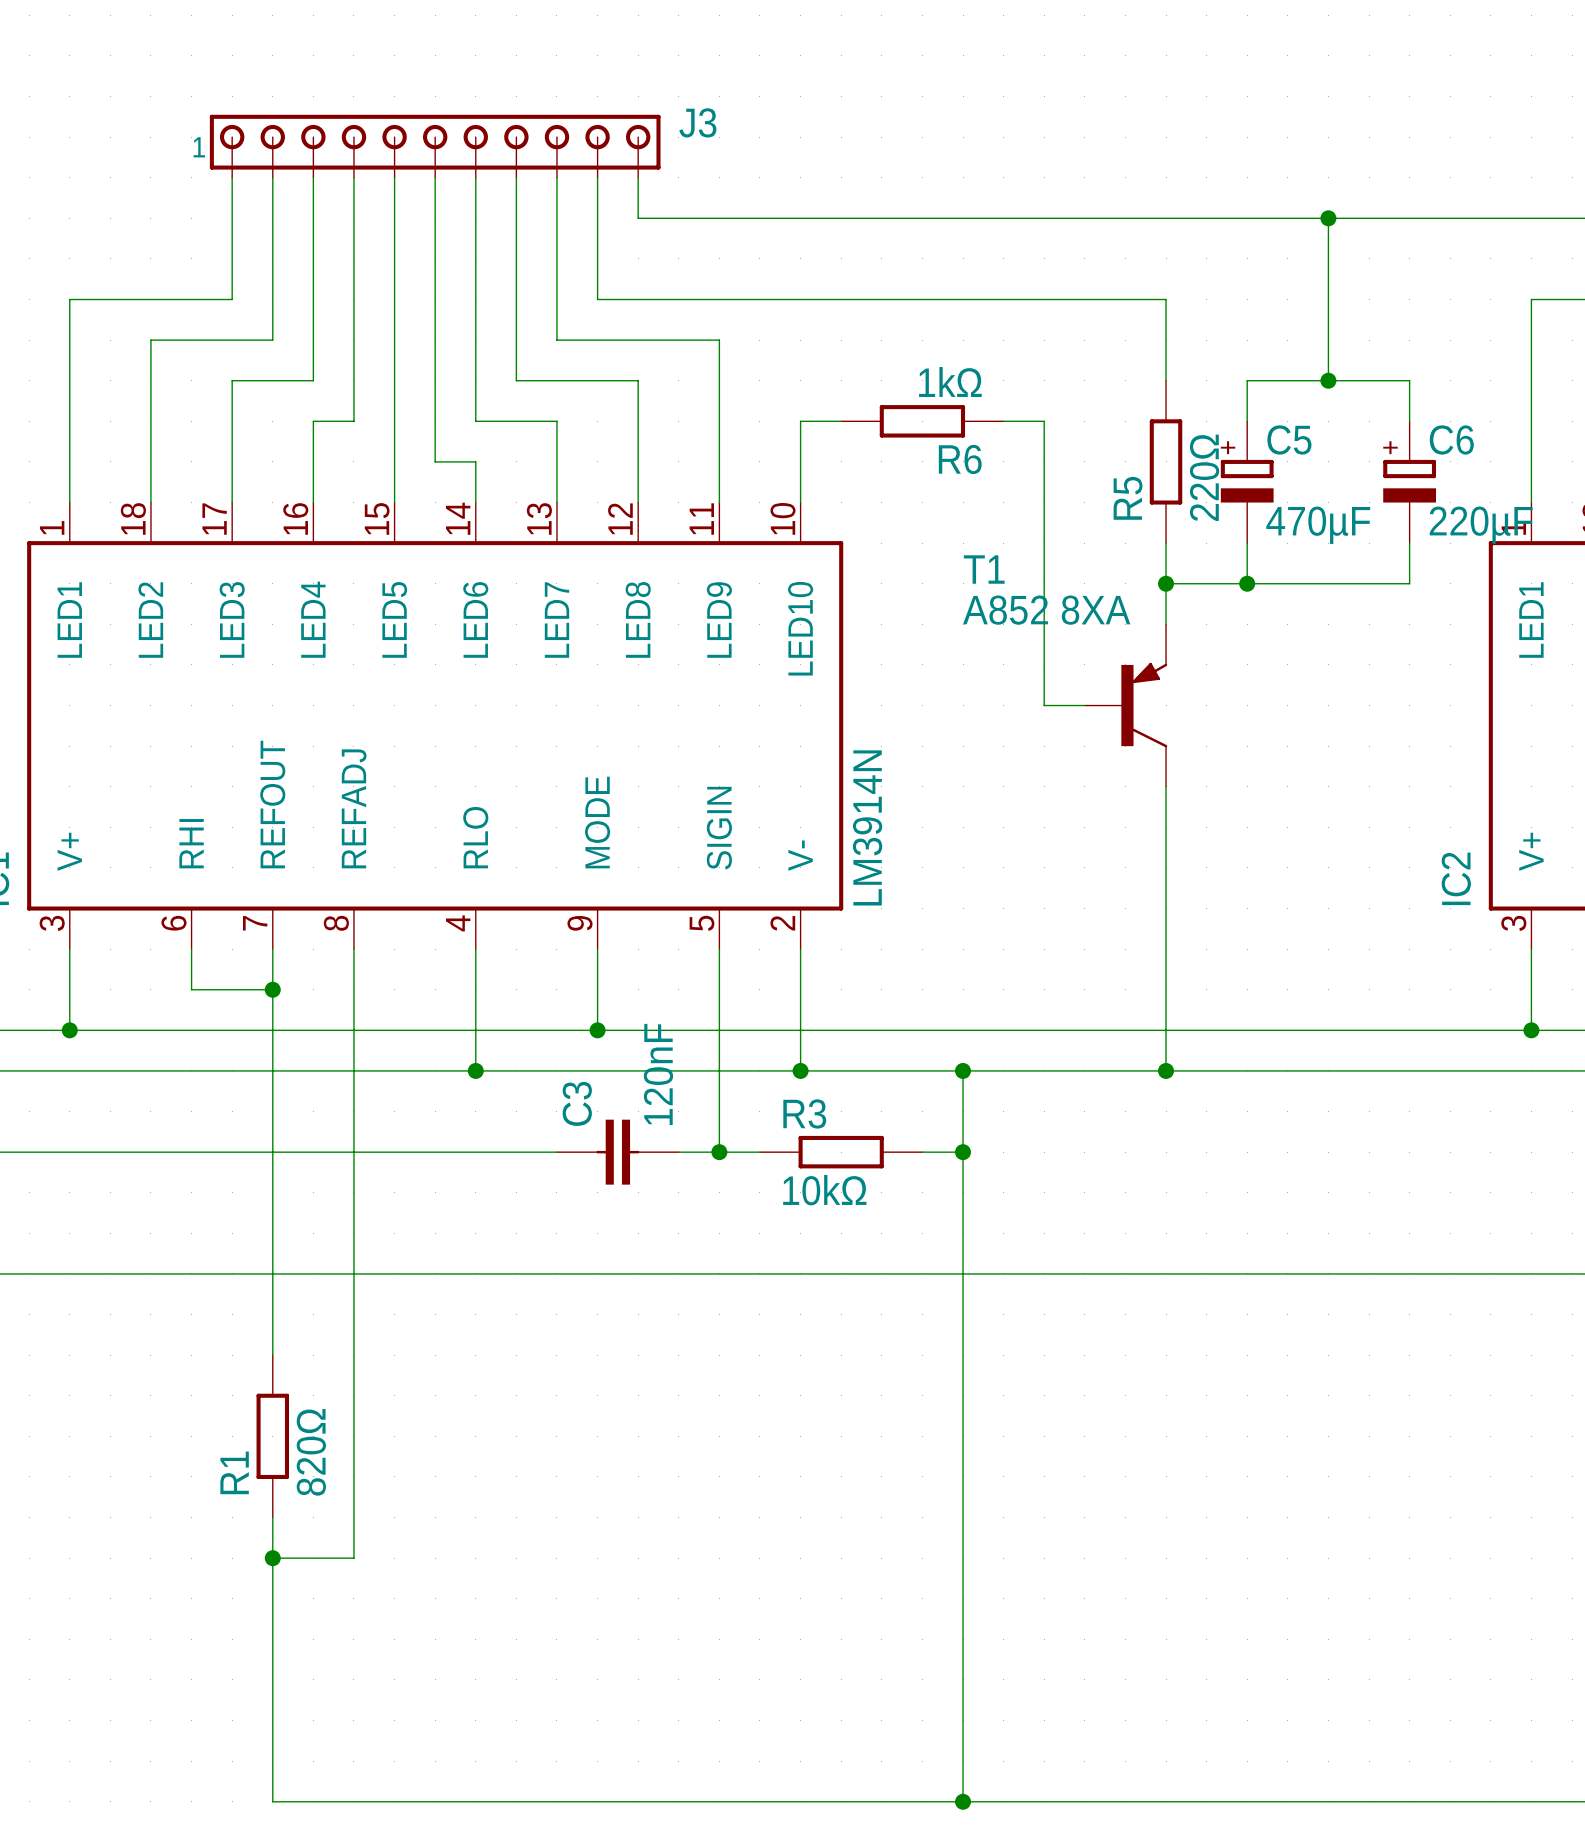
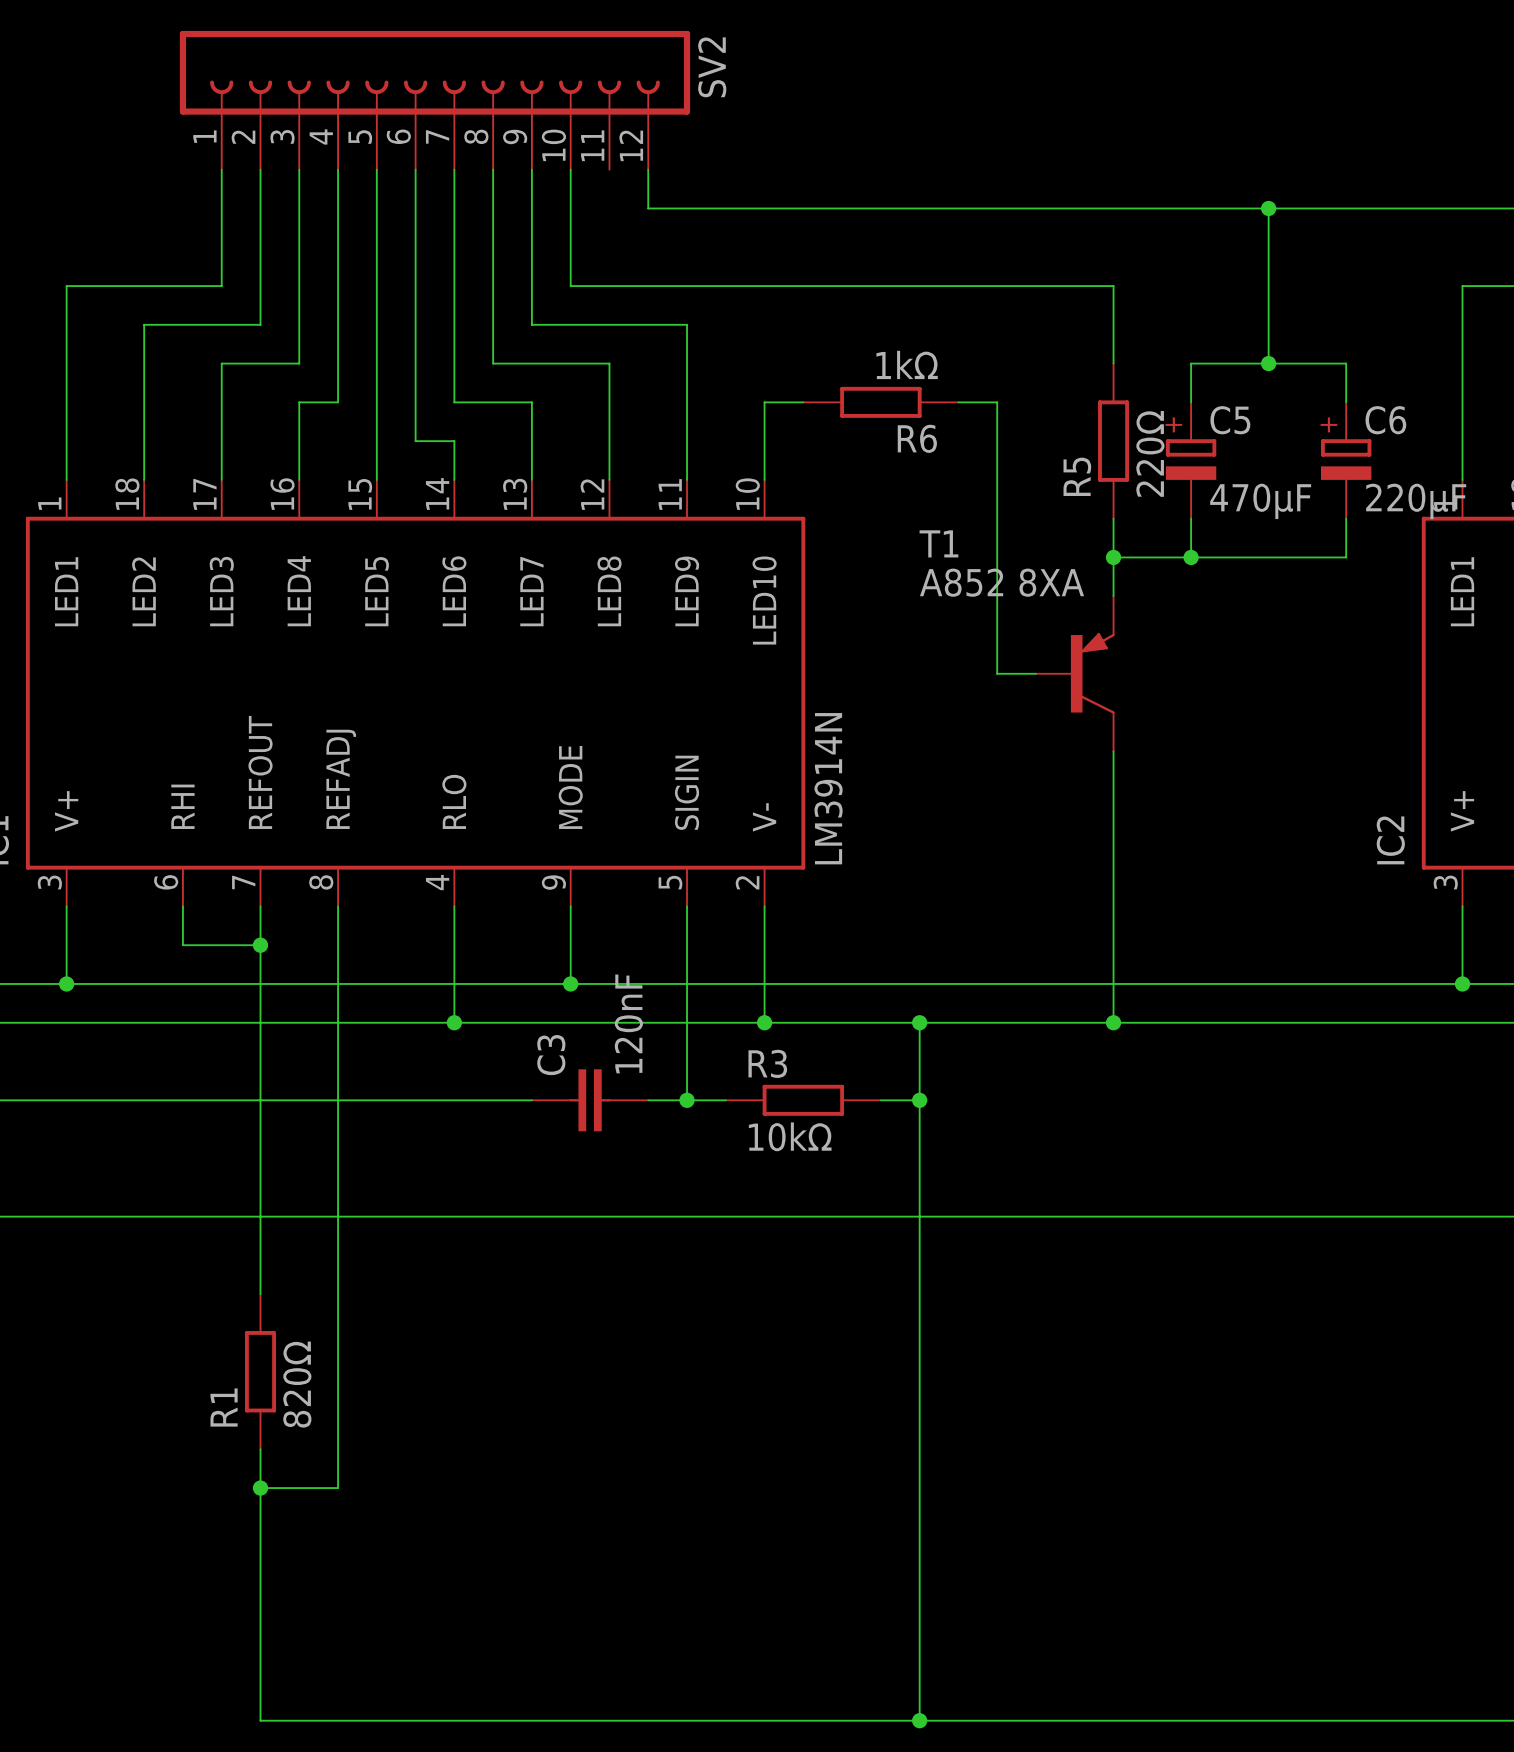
SV2: none -> (434, 100)
J3: (435, 146) -> none
wire: (638, 177) (638, 218) (678, 218) -> (648, 169) (648, 208)

